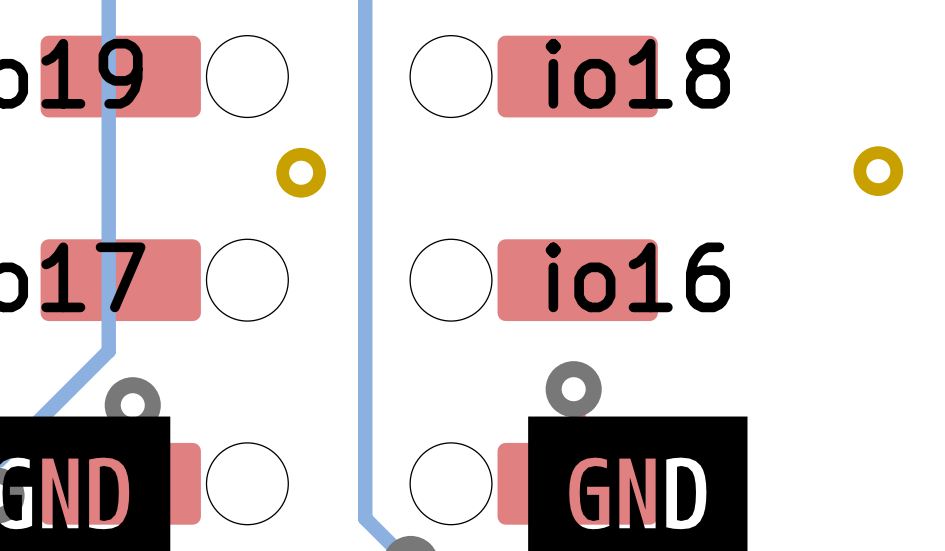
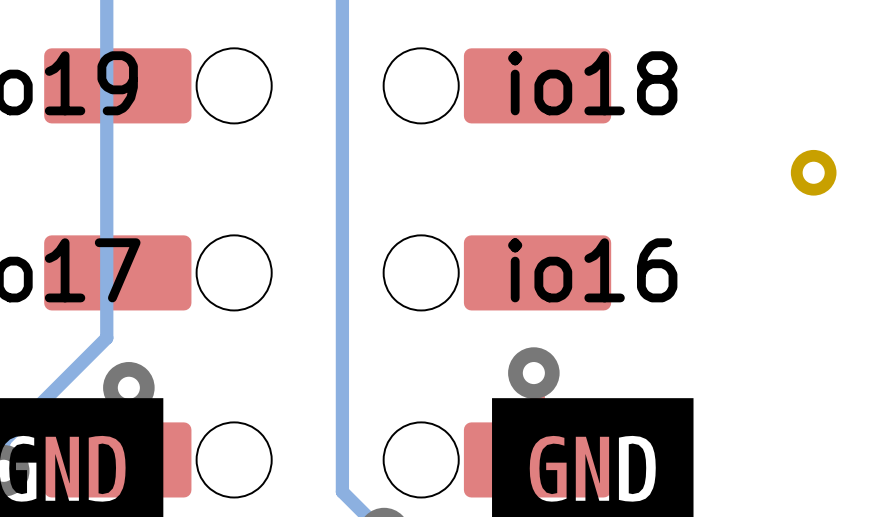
part: (301, 172) -> none

